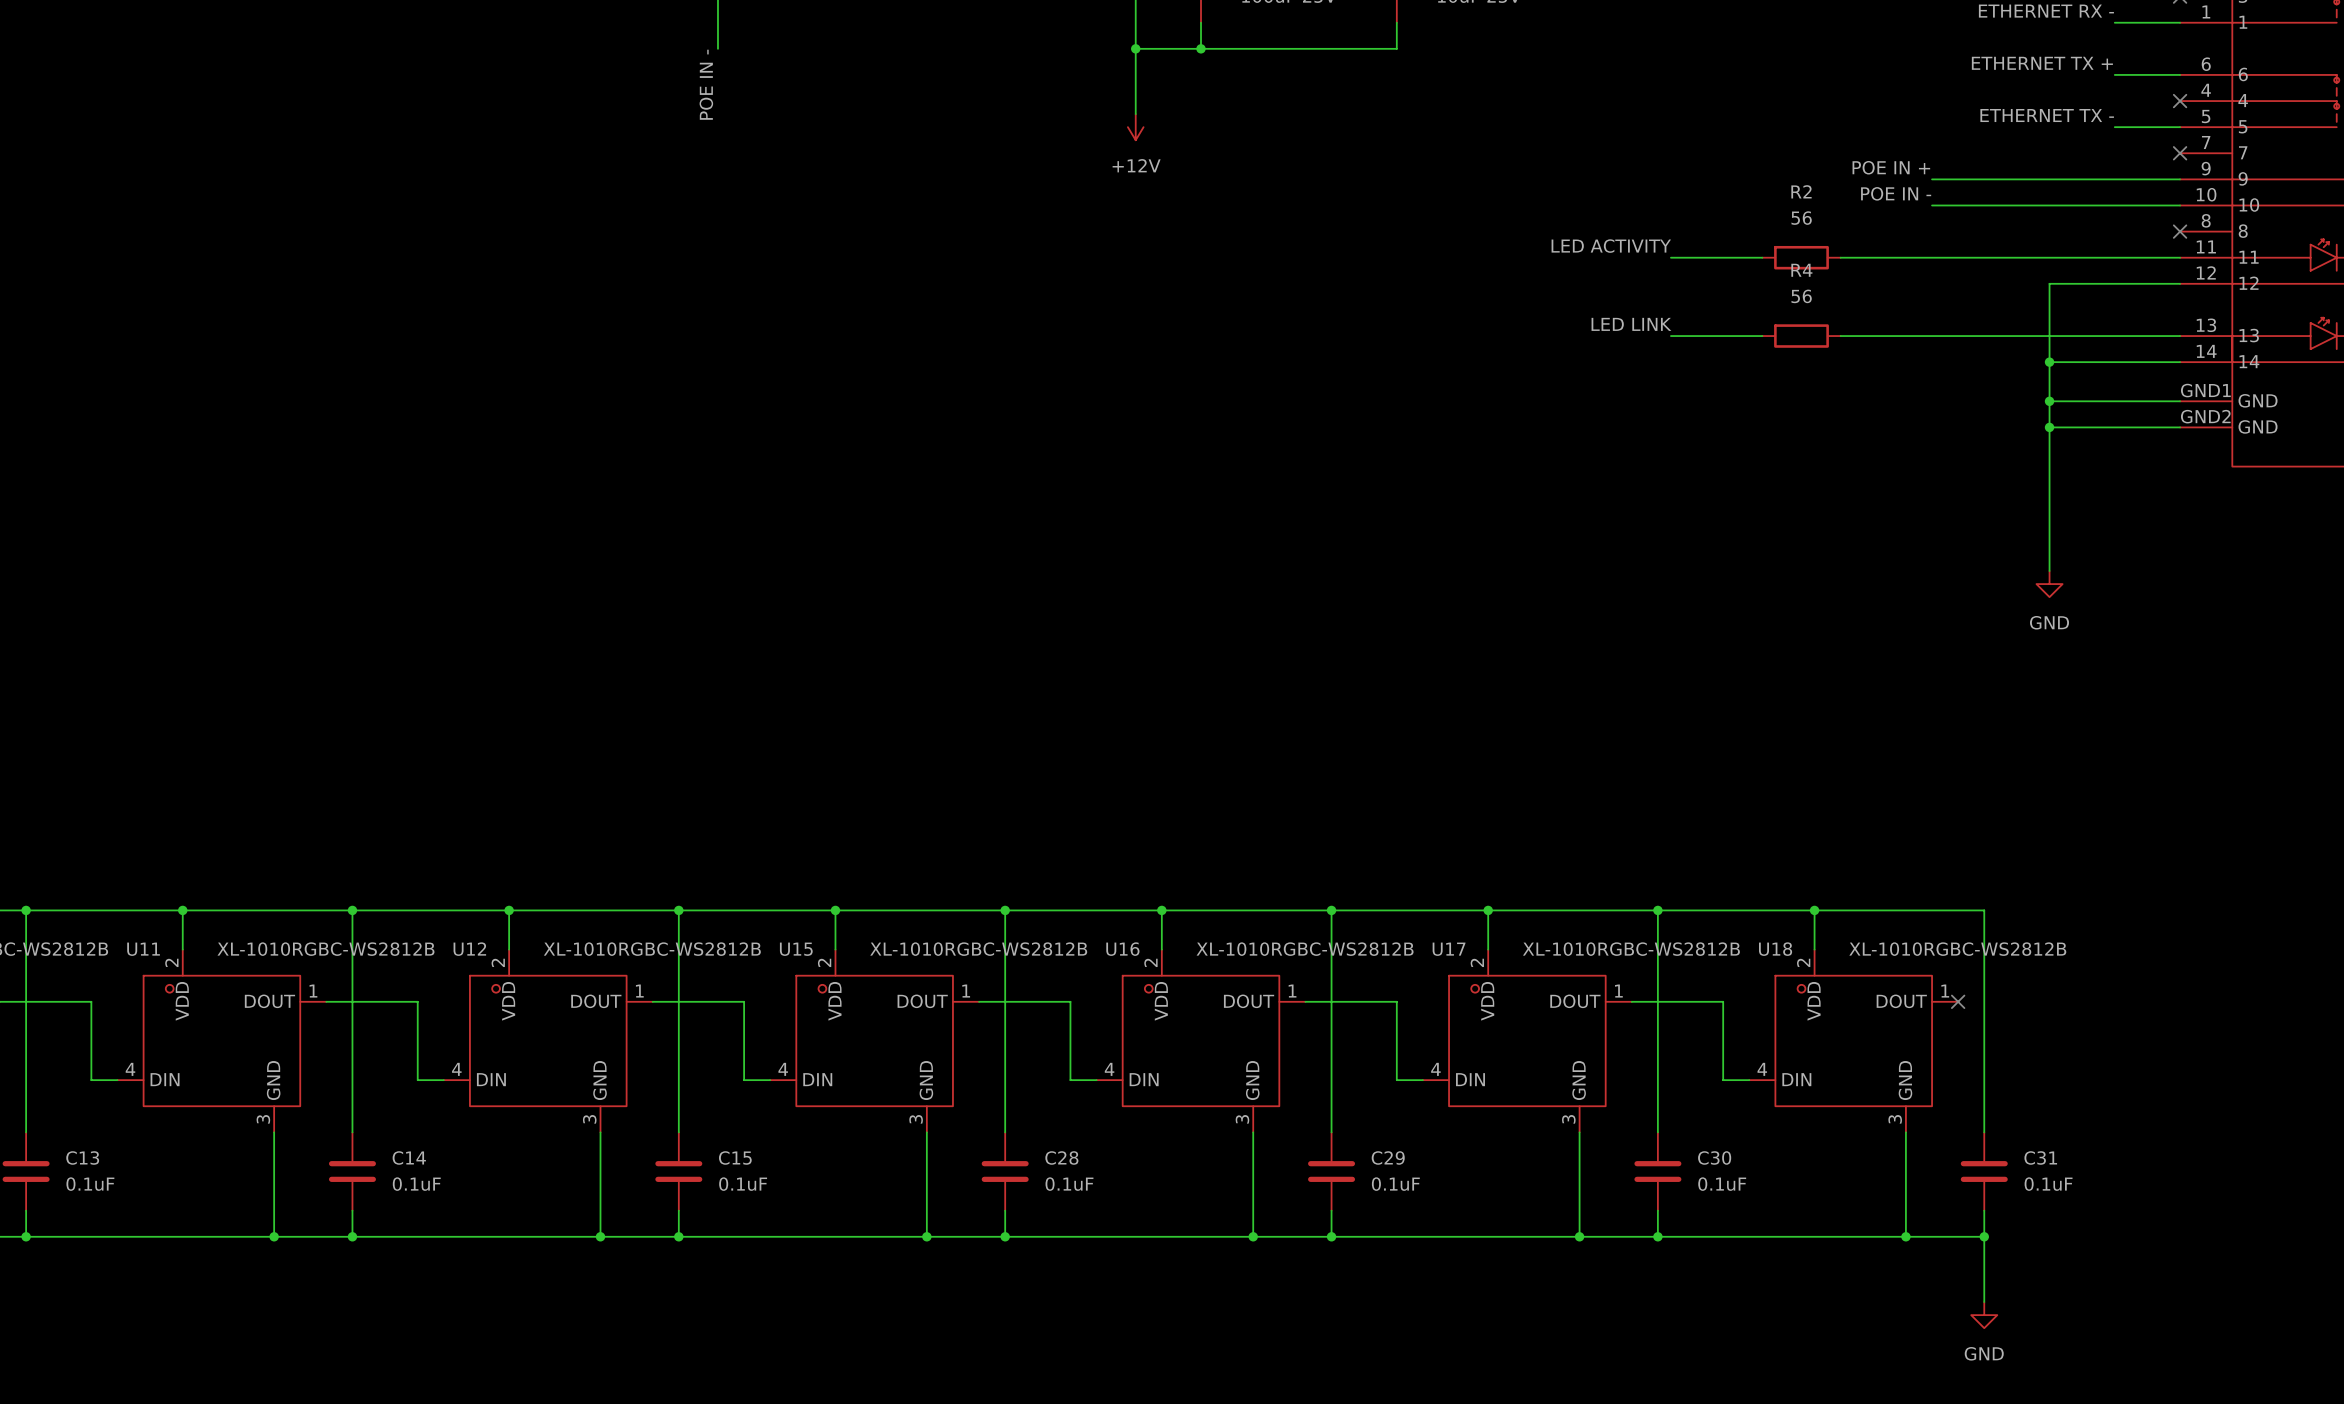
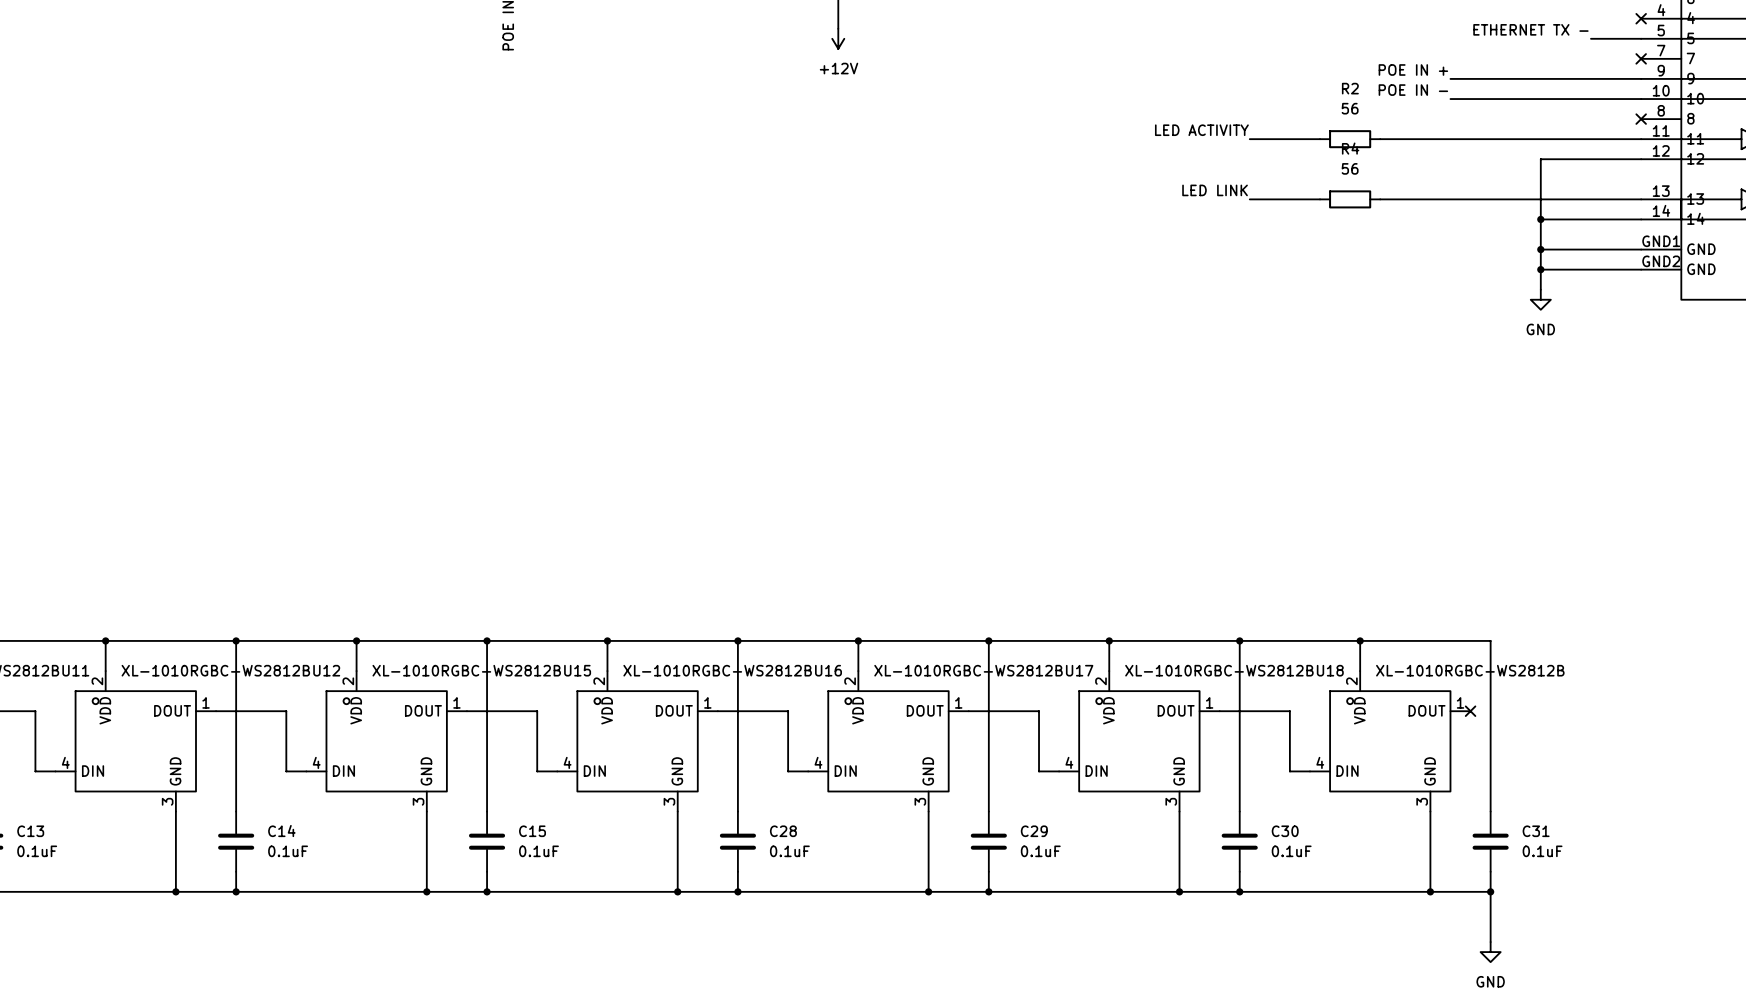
wire: (2049, 453) (2049, 571) -> none
power symbol position: GND (2049, 584) -> GND (1540, 299)

